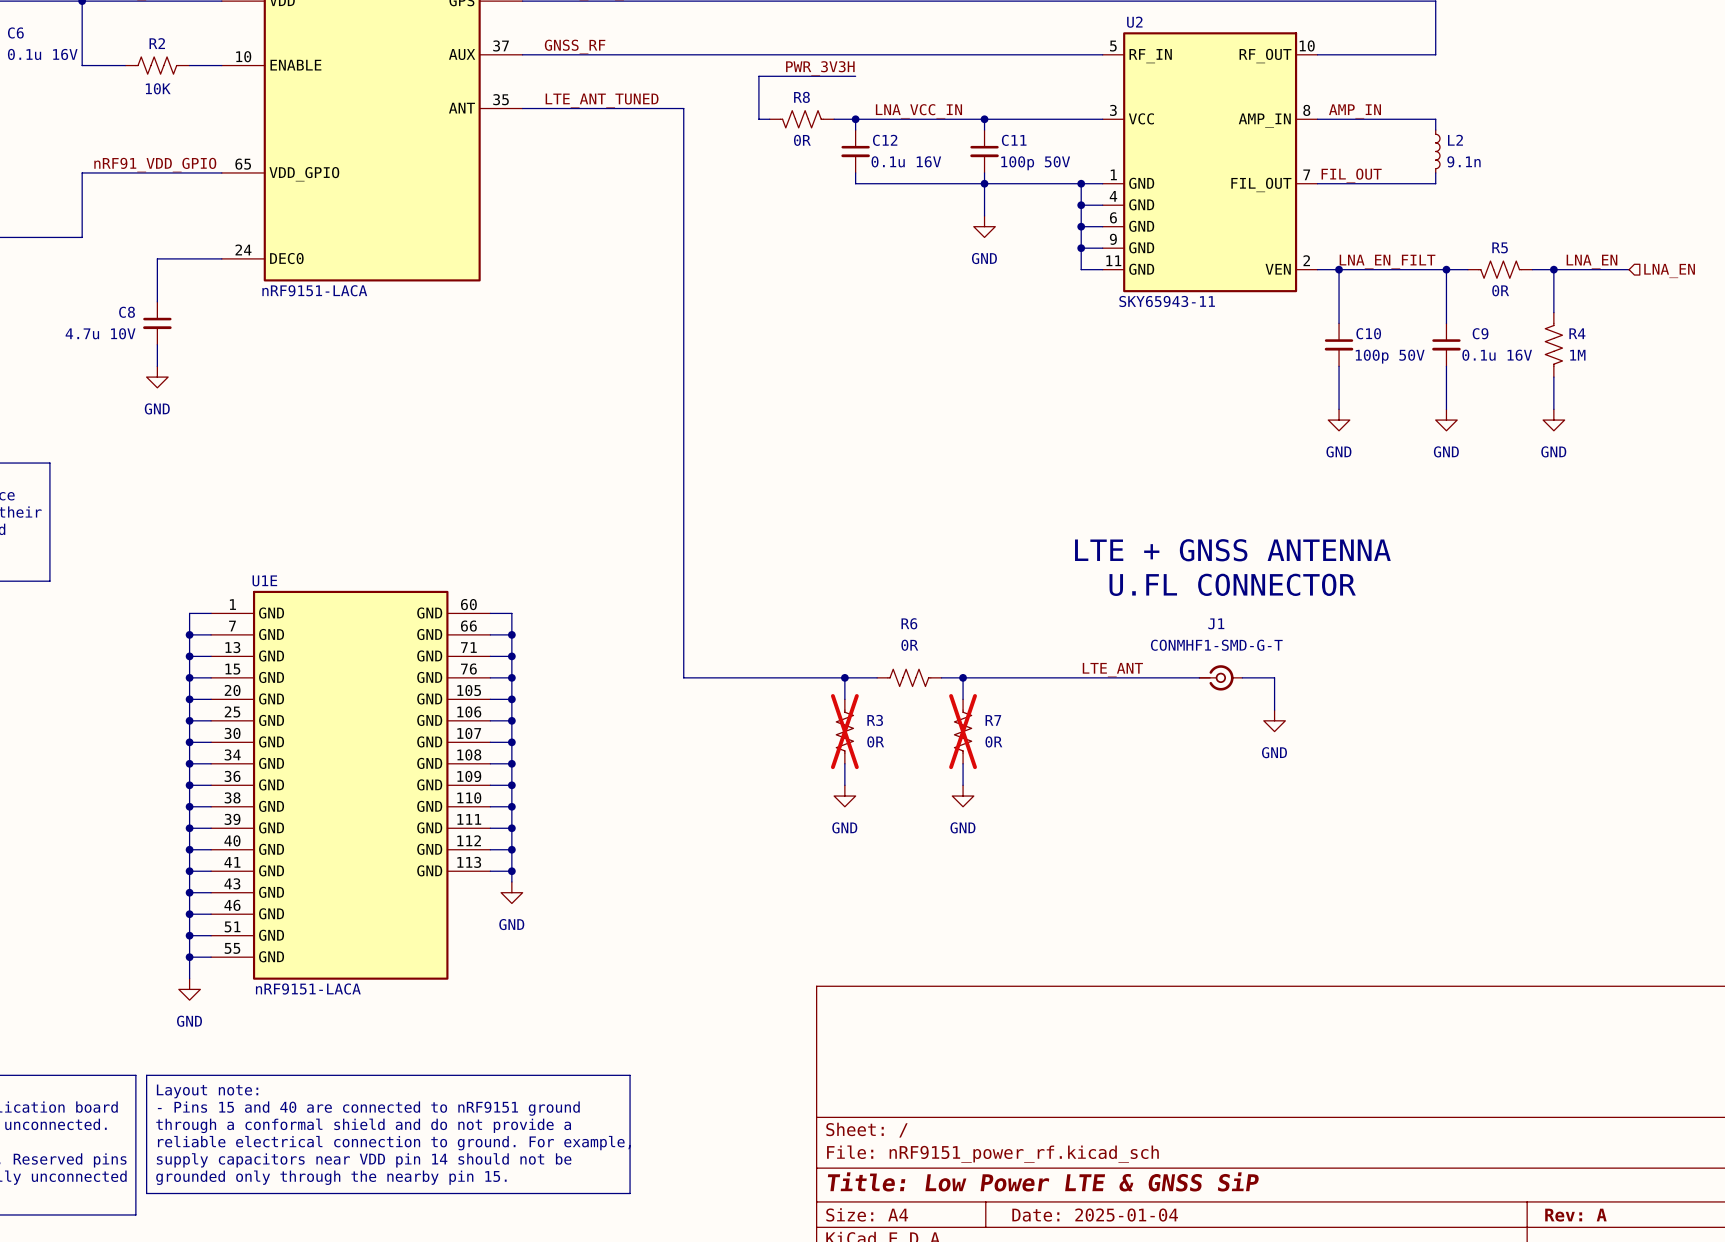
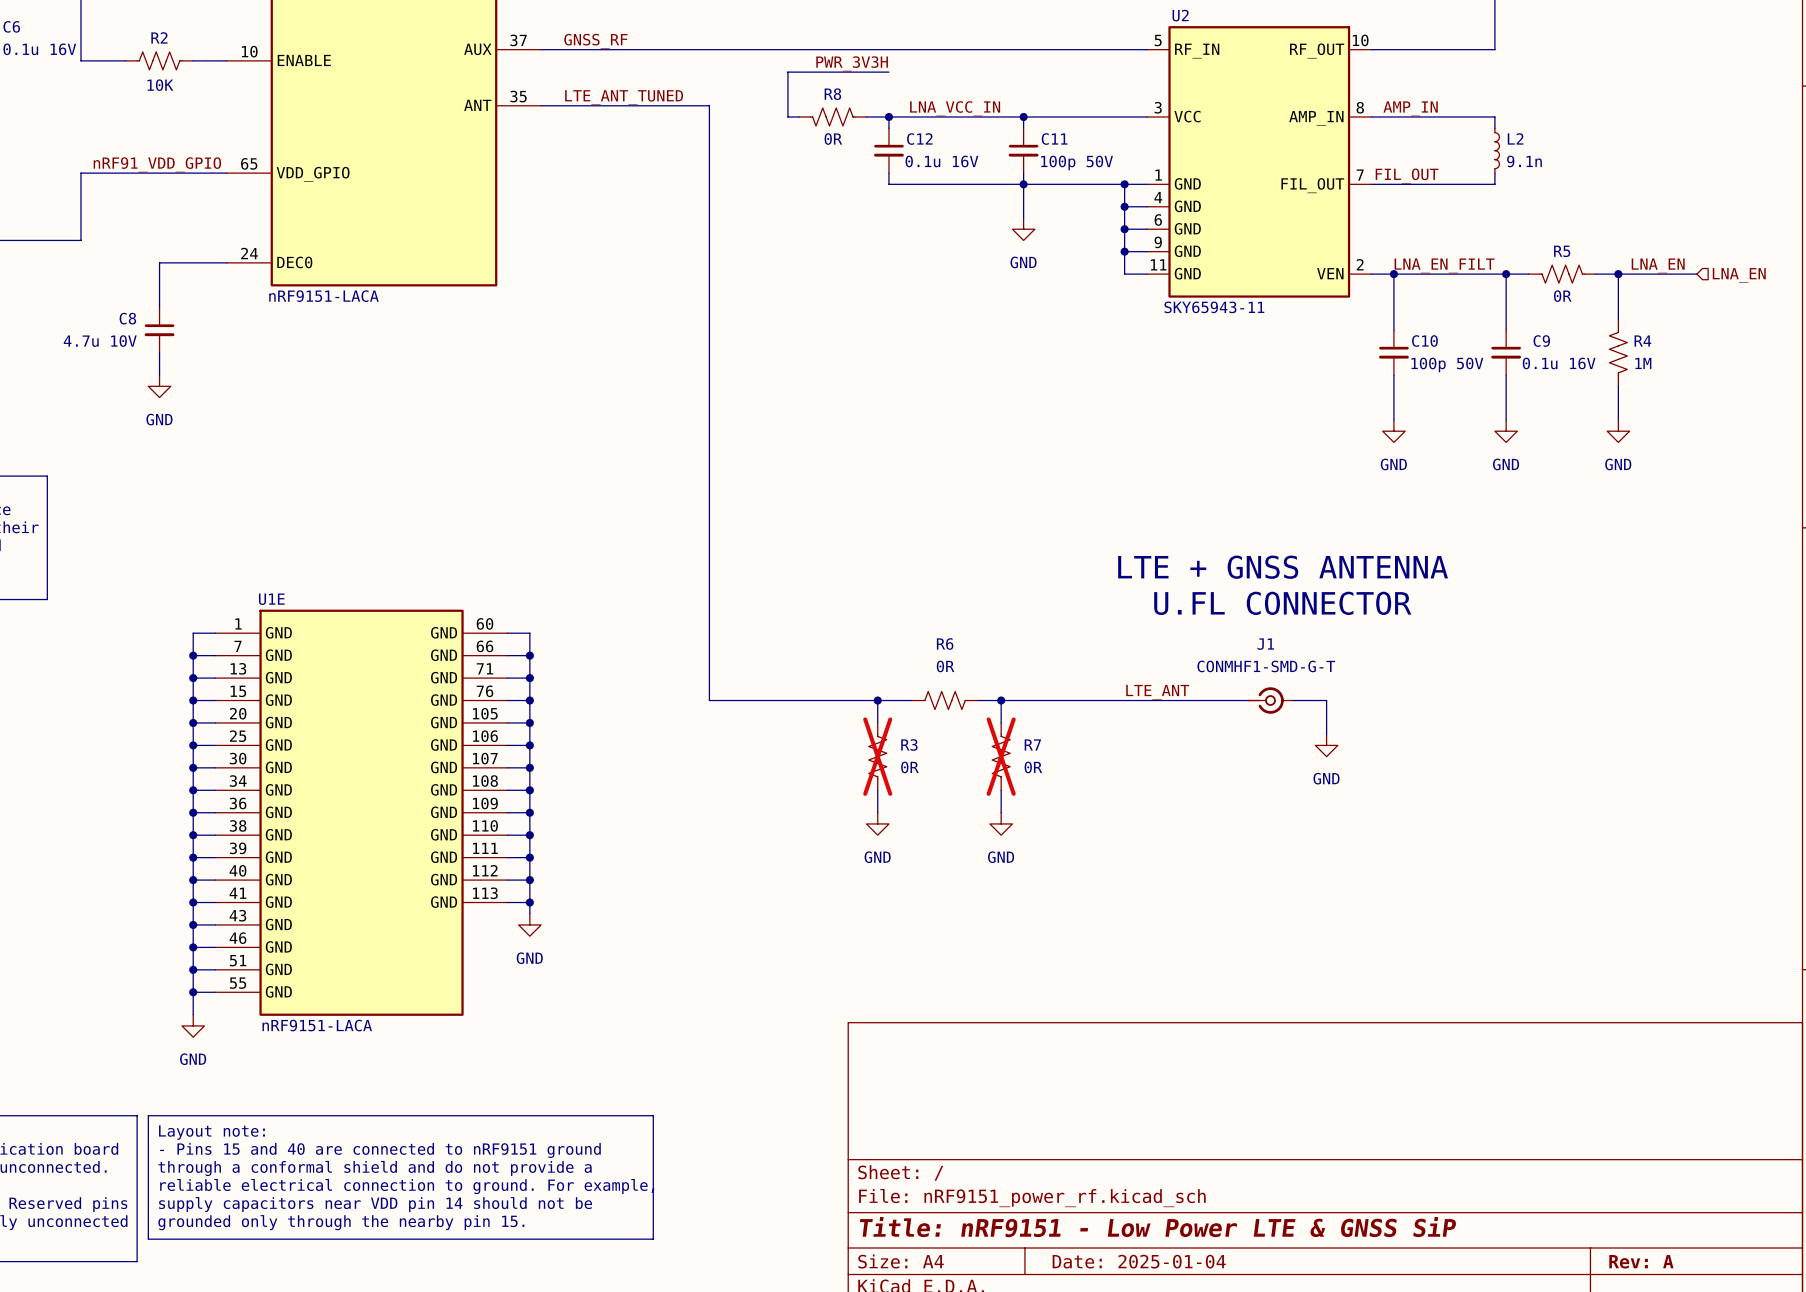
title block: Title: Low Power LTE & GNSS SiP (1043, 1181) -> Title: nRF9151 - Low Power LTE & GNSS SiP (1158, 1227)

